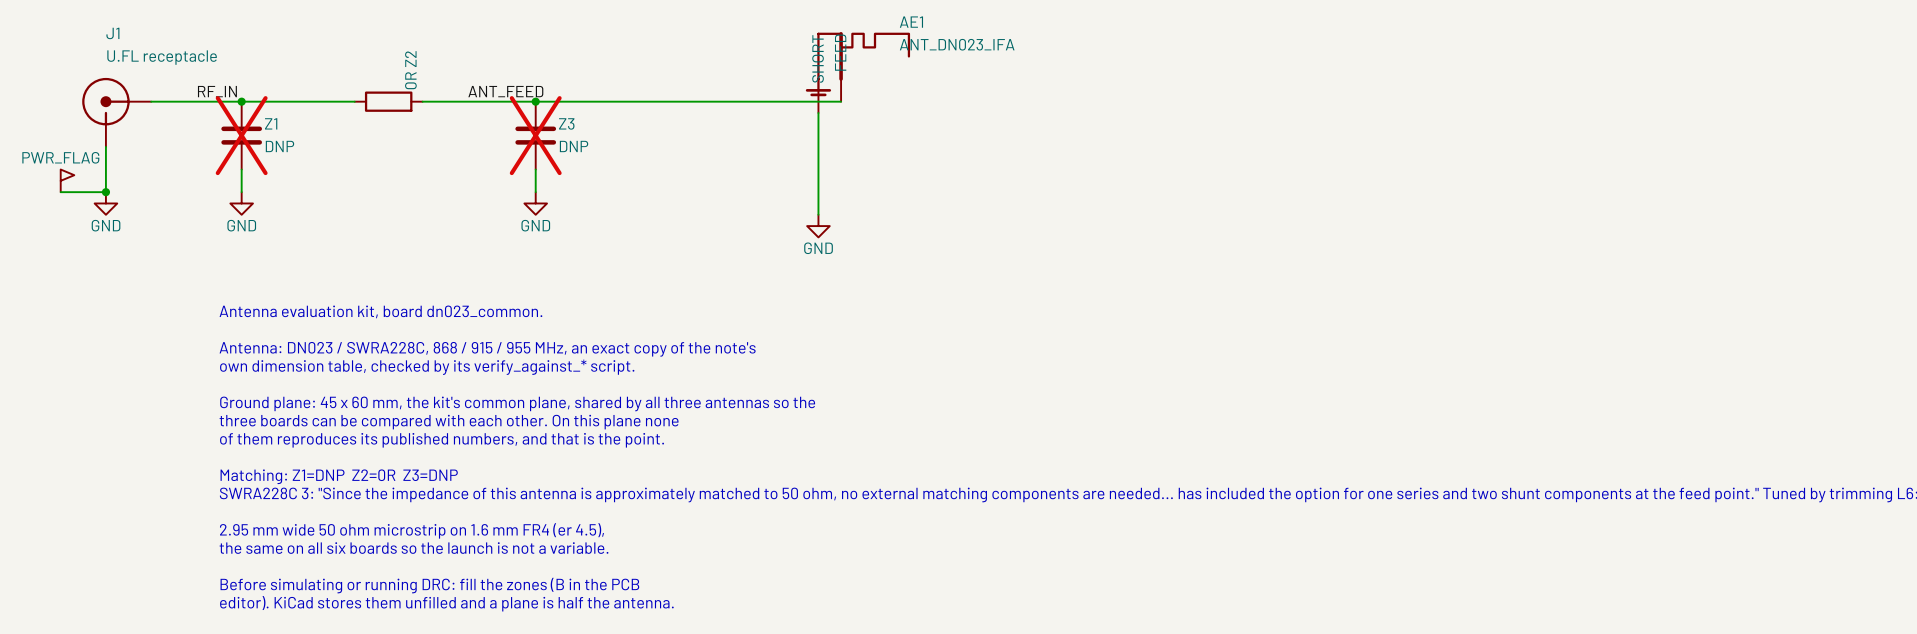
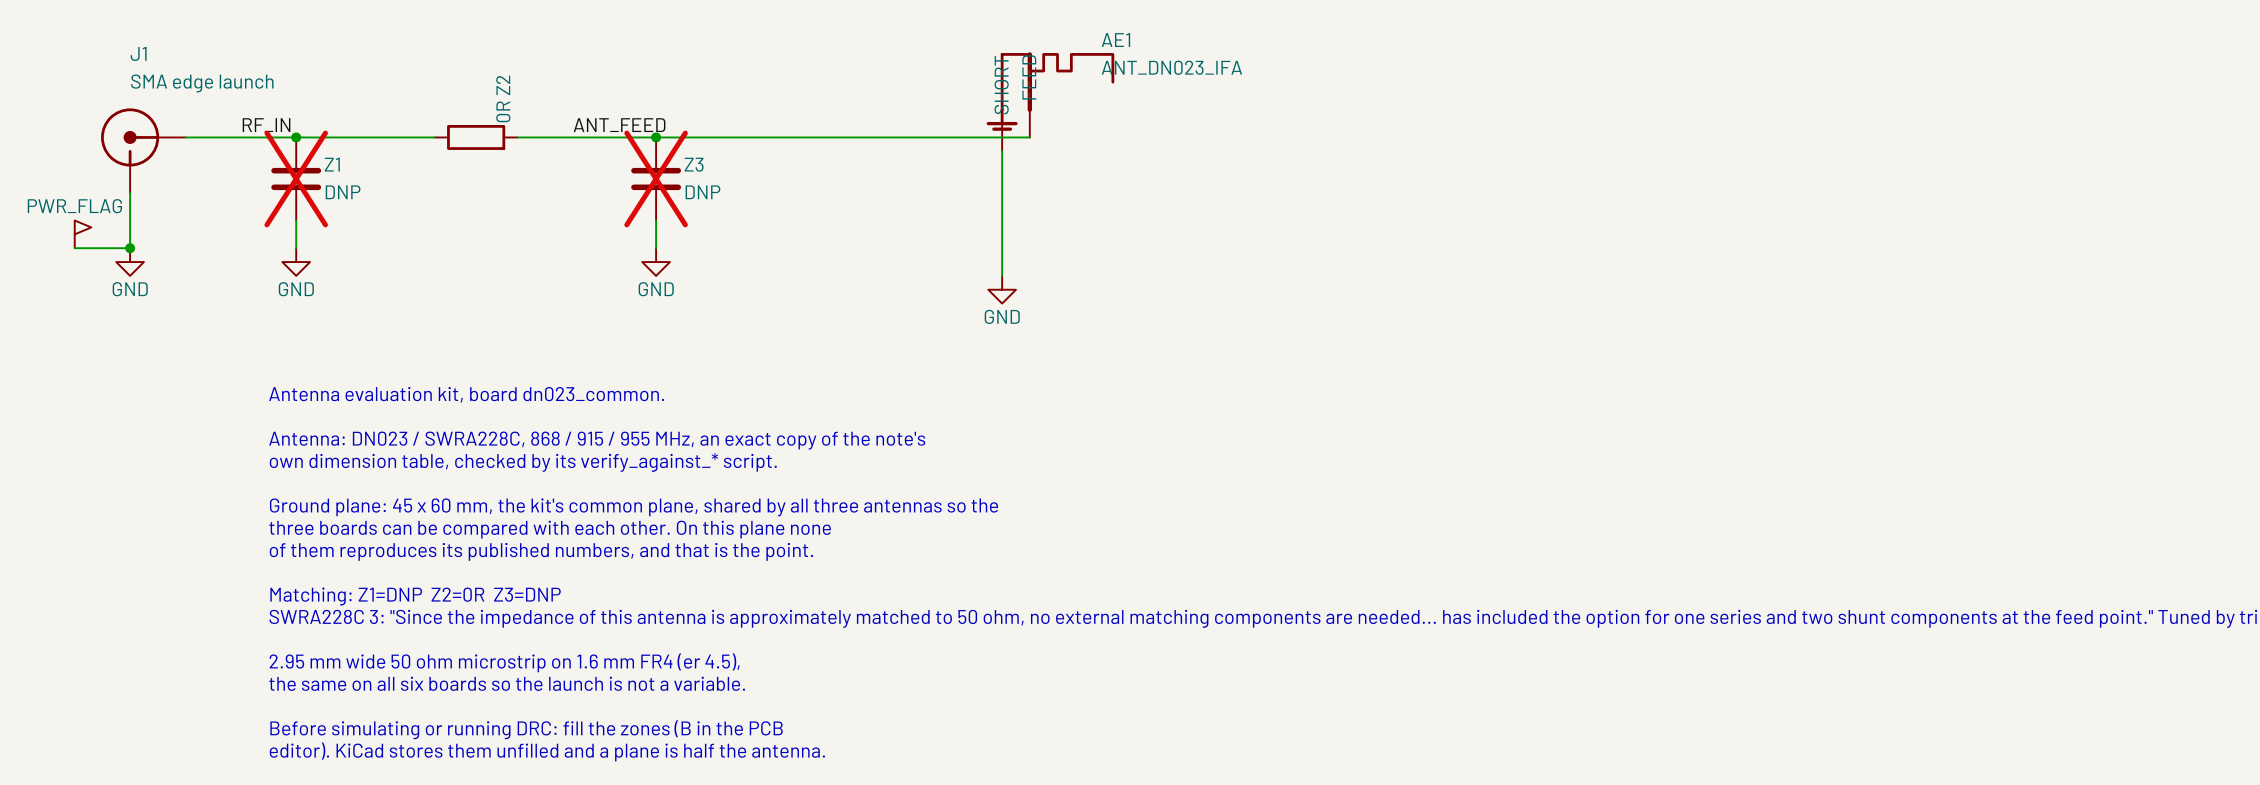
J1 value: U.FL receptacle (162, 57) -> SMA edge launch (202, 83)

